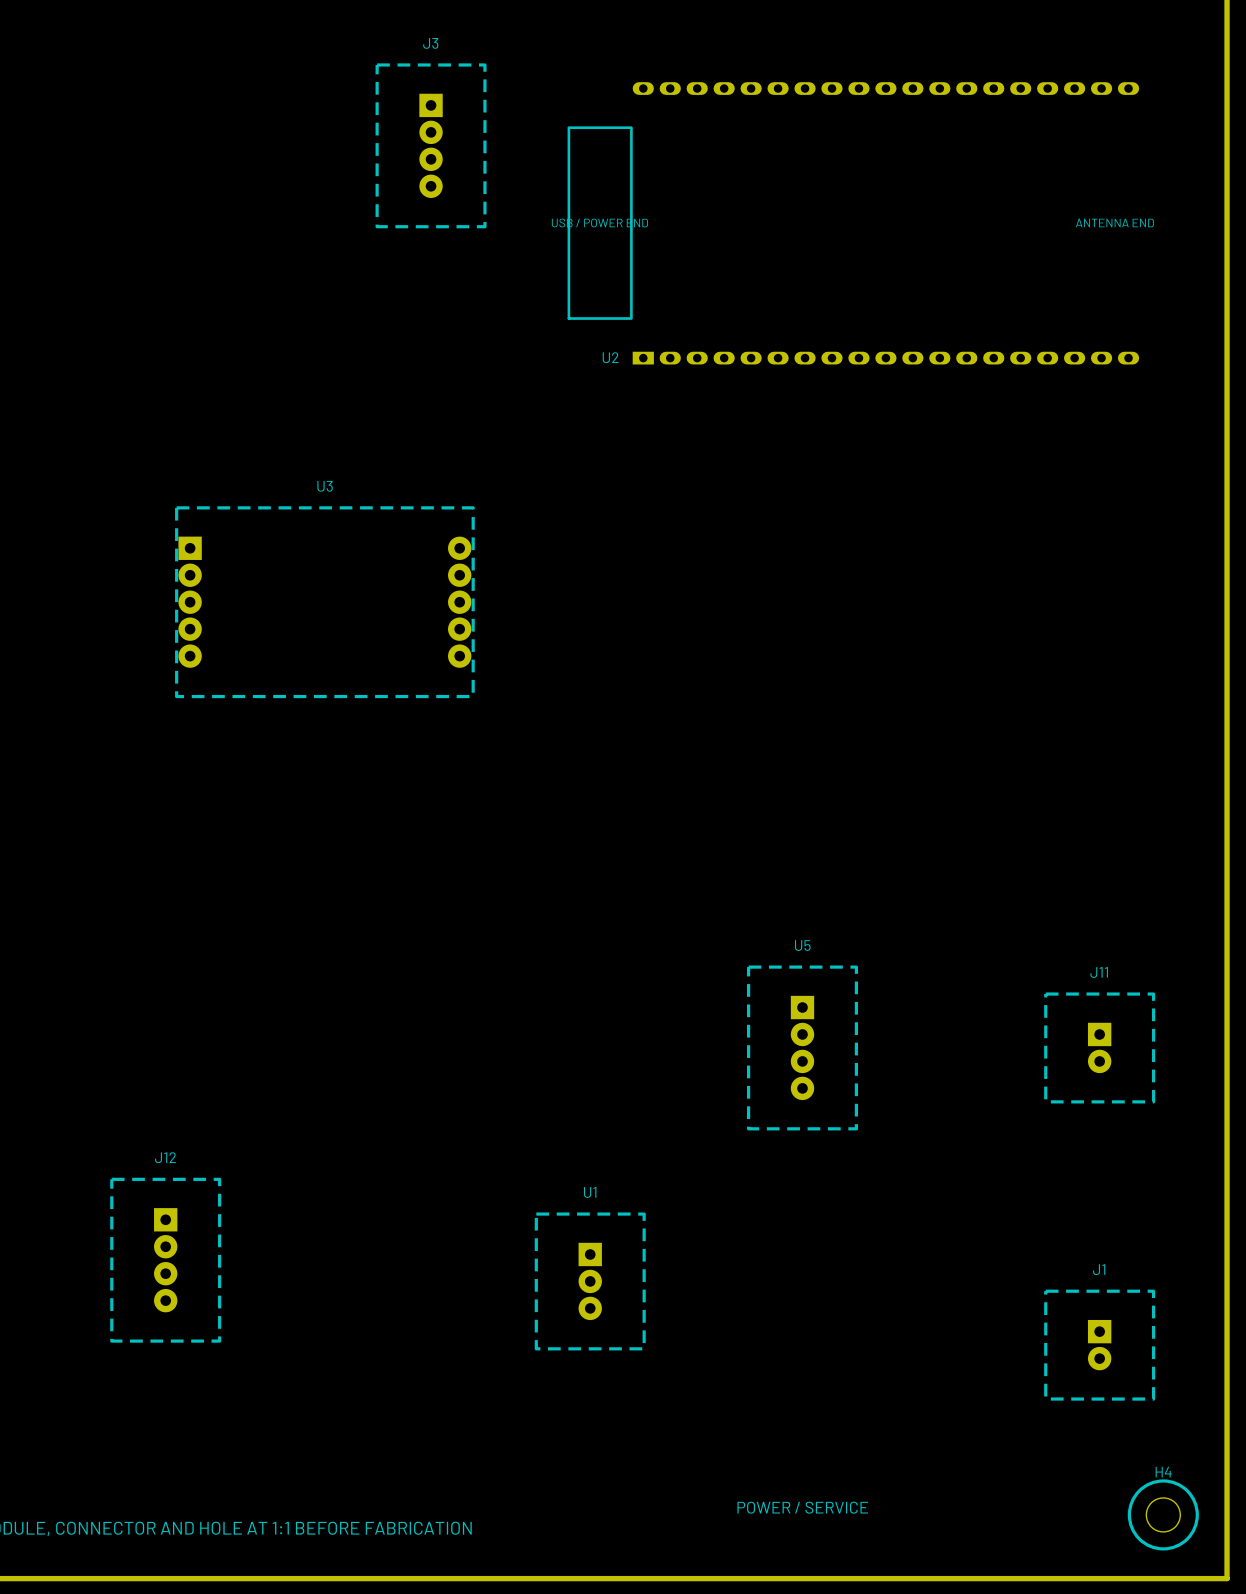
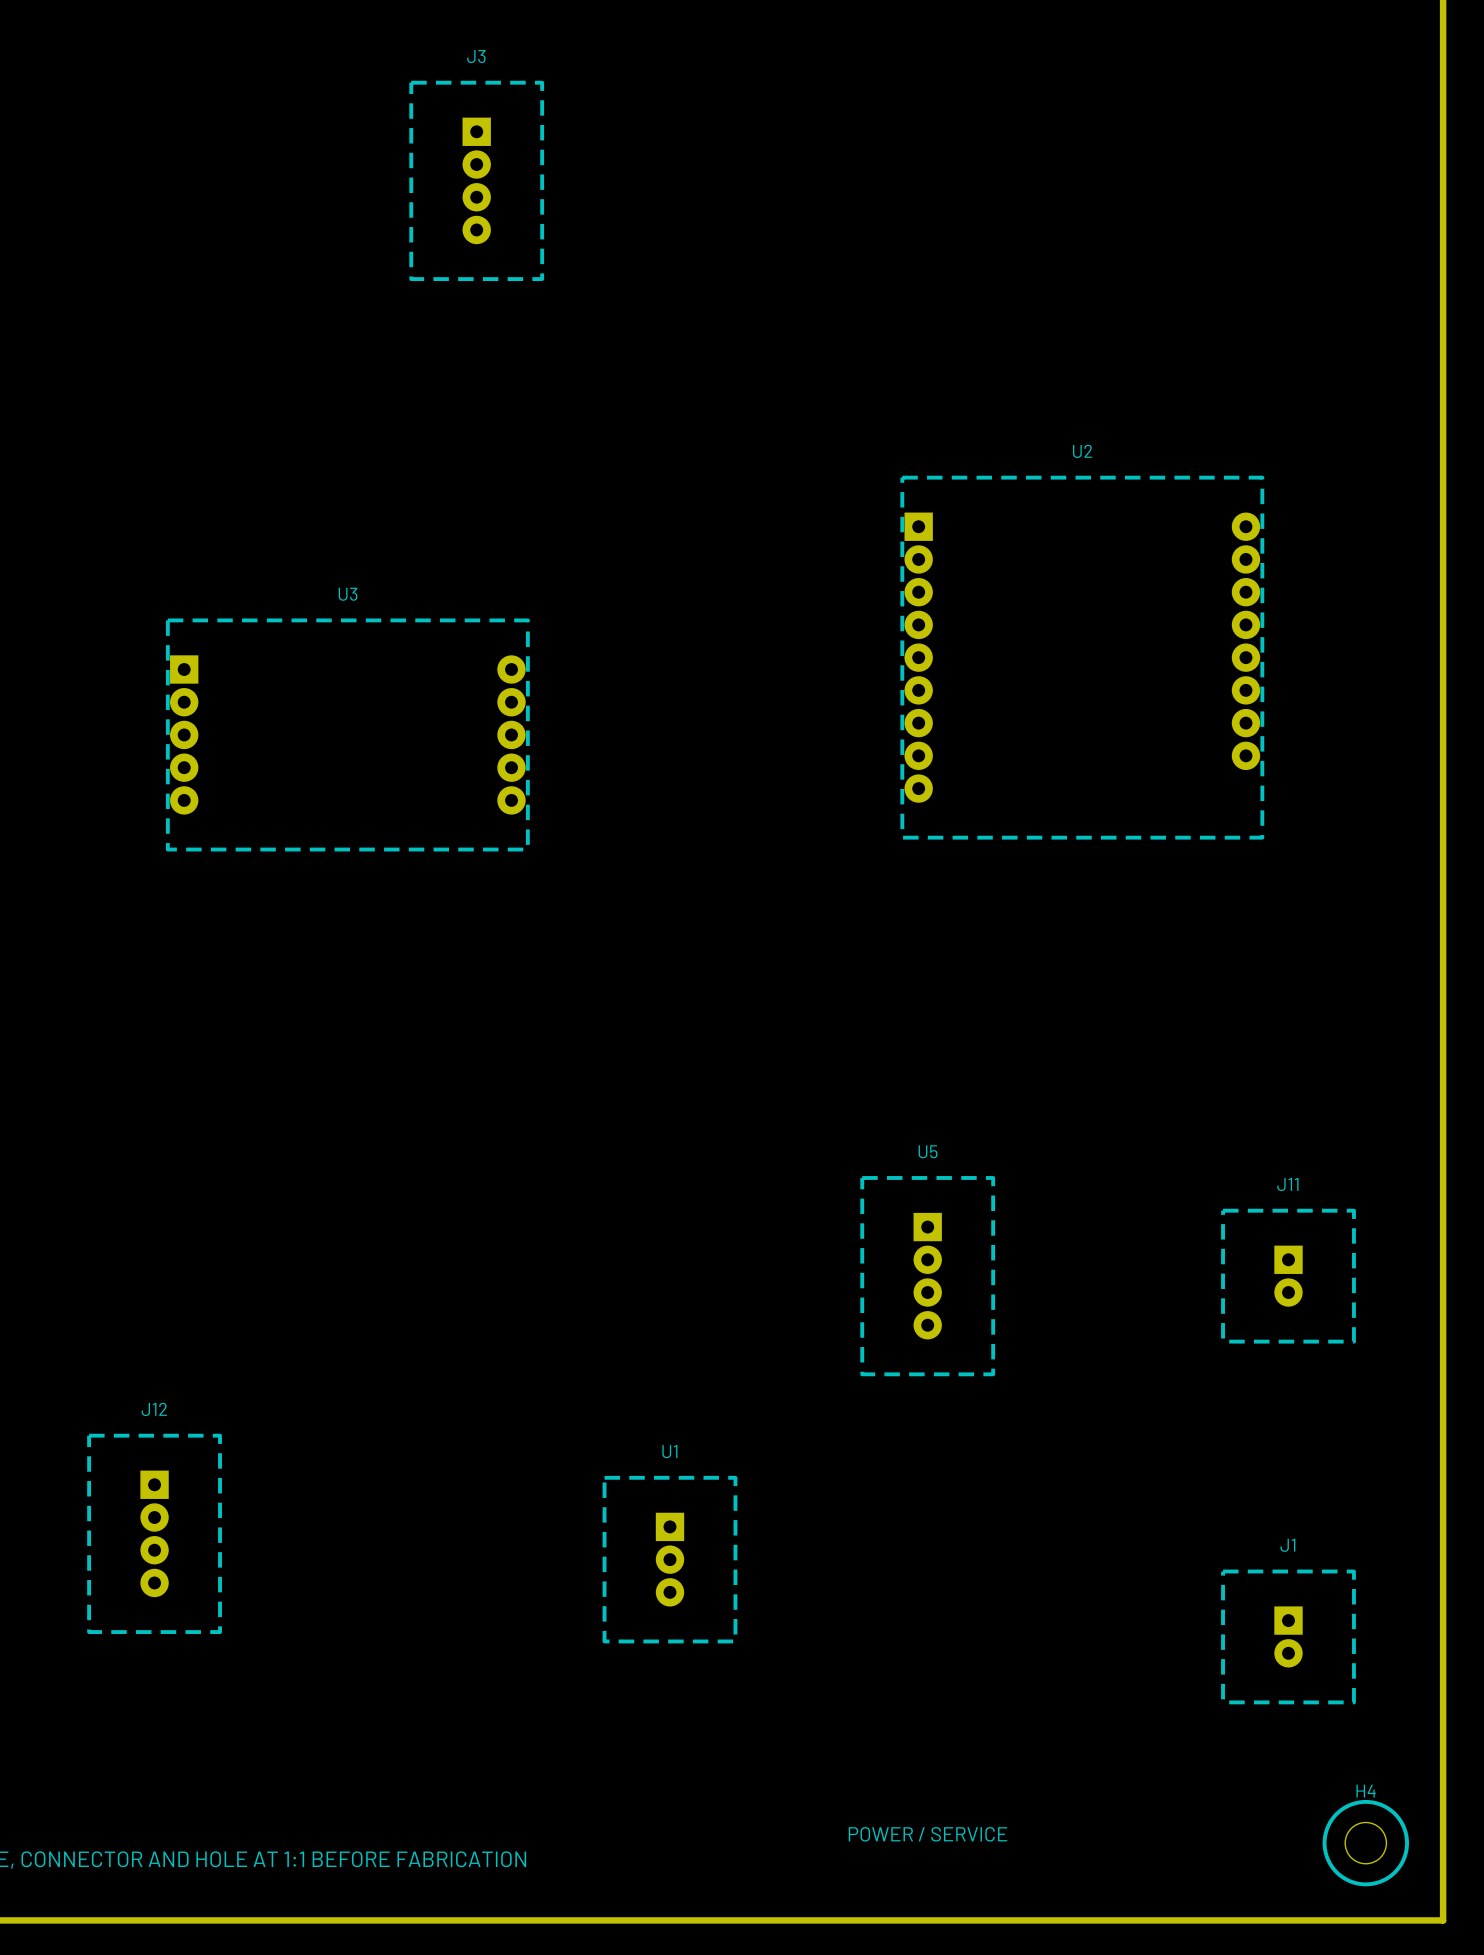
U2 footprint: [567, 82, 1140, 365] -> [900, 475, 1265, 840]
U2 name position: U2 (610, 357) -> U2 (1082, 451)

